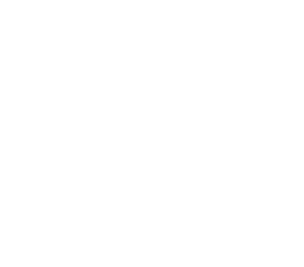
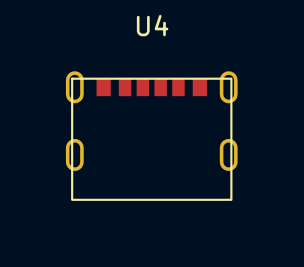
U4: none -> (151, 136)

